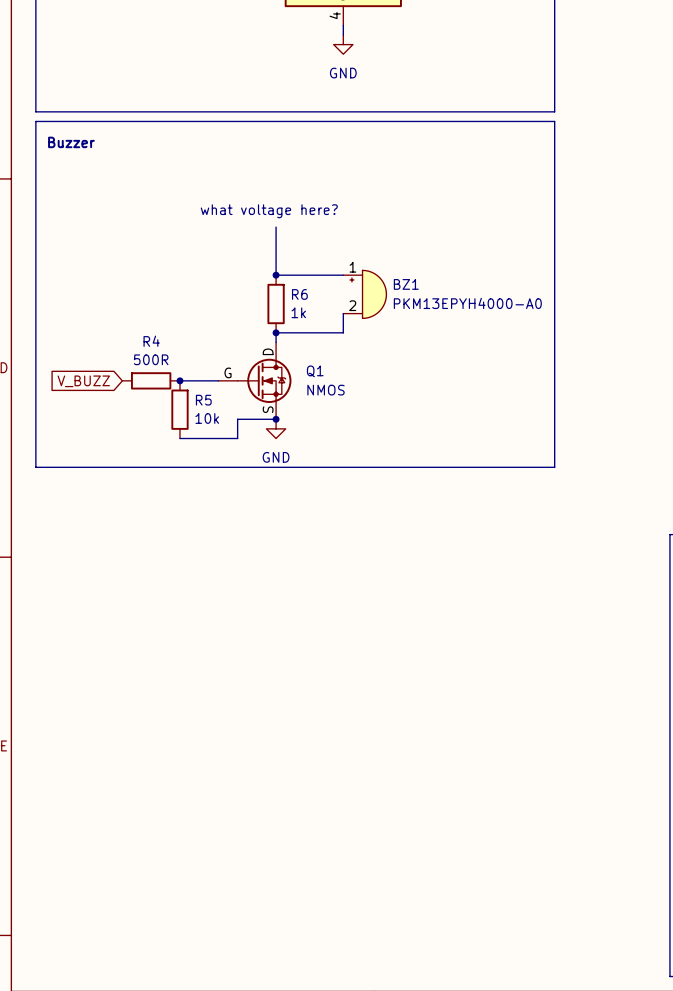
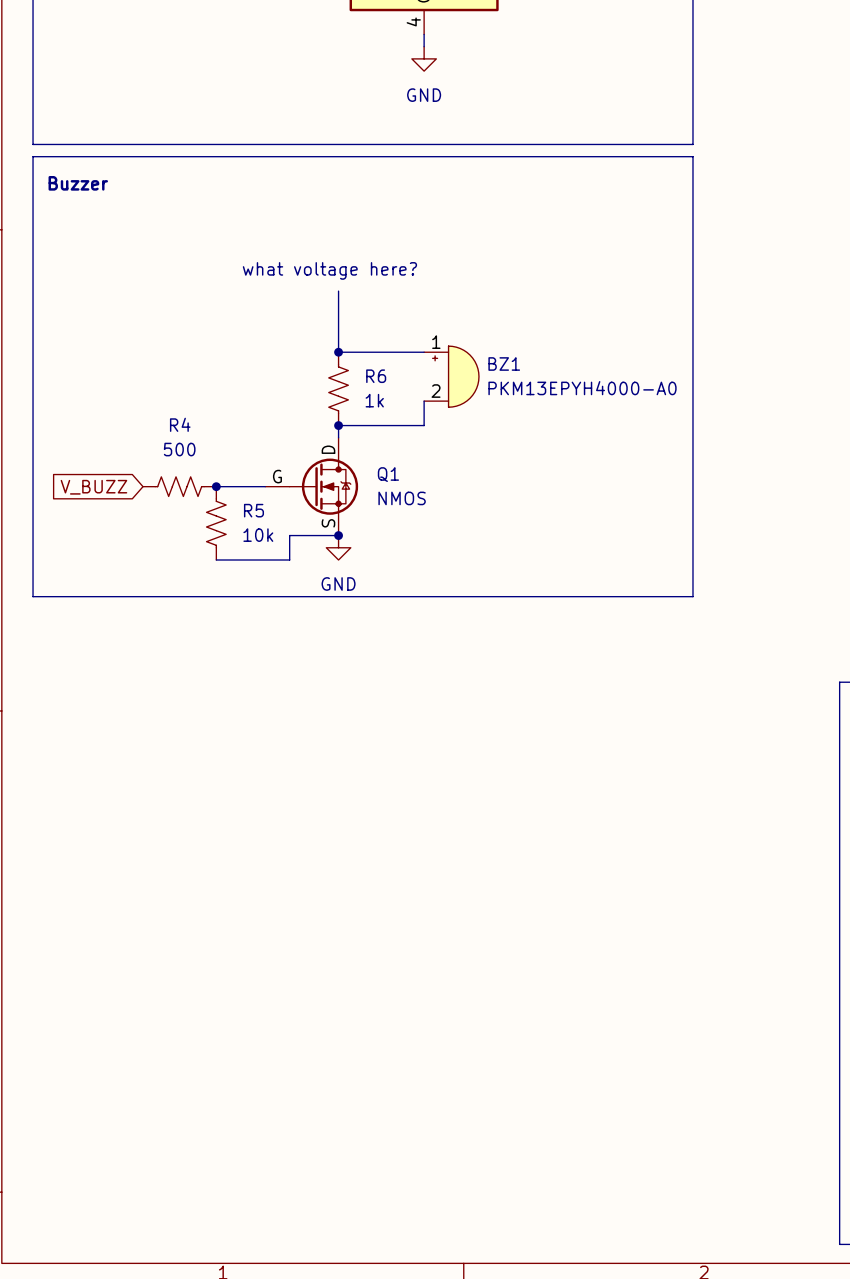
R6 symbol: [267, 275, 285, 333] -> [328, 352, 349, 426]
R4 value: 500R (151, 359) -> 500 (179, 449)
R4 symbol: [122, 372, 180, 390] -> [143, 476, 217, 497]
R5 symbol: [171, 380, 189, 439] -> [206, 486, 227, 561]

